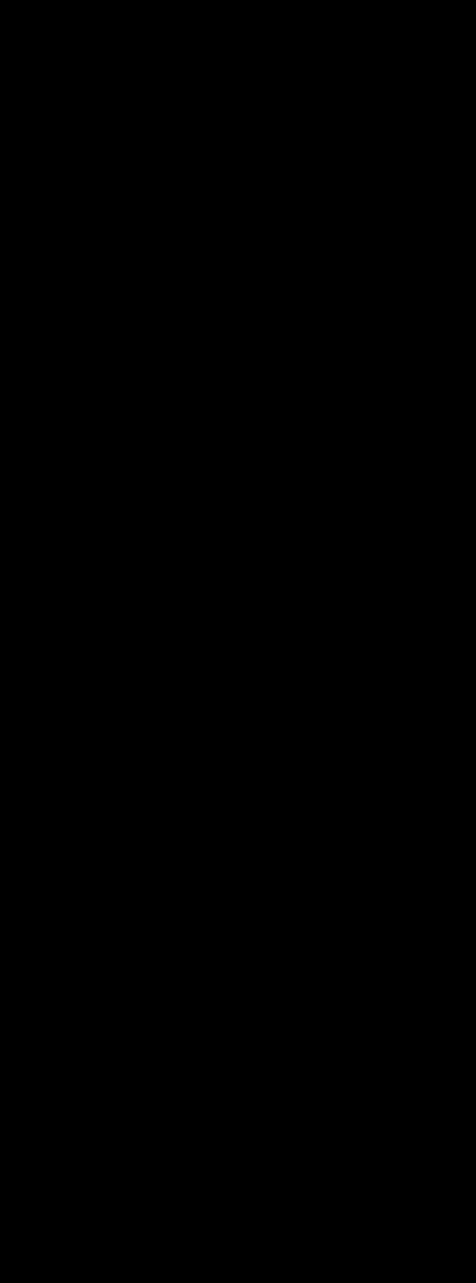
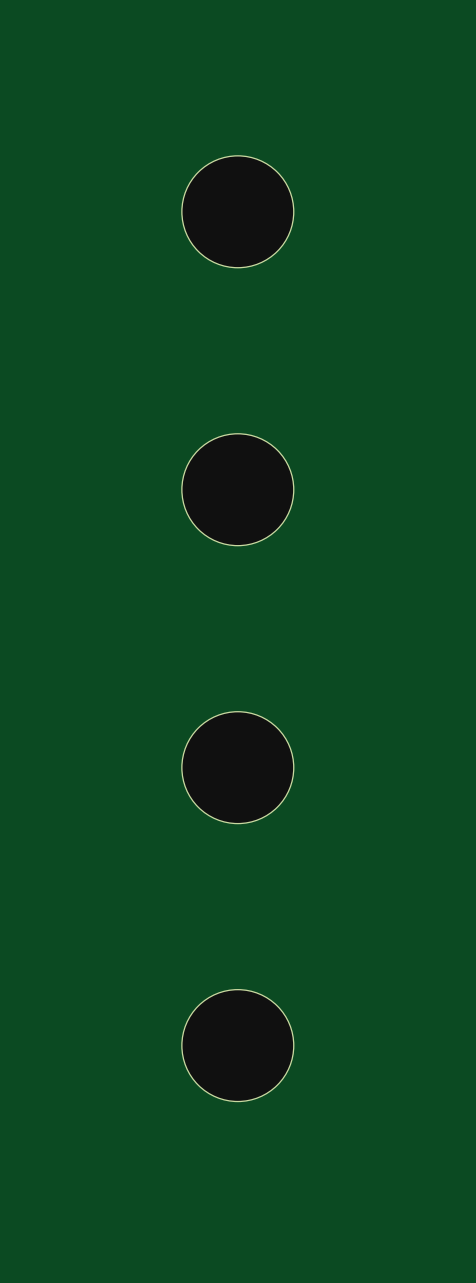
part: none -> (237, 211)
part: none -> (237, 489)
part: none -> (237, 767)
part: none -> (237, 1045)

